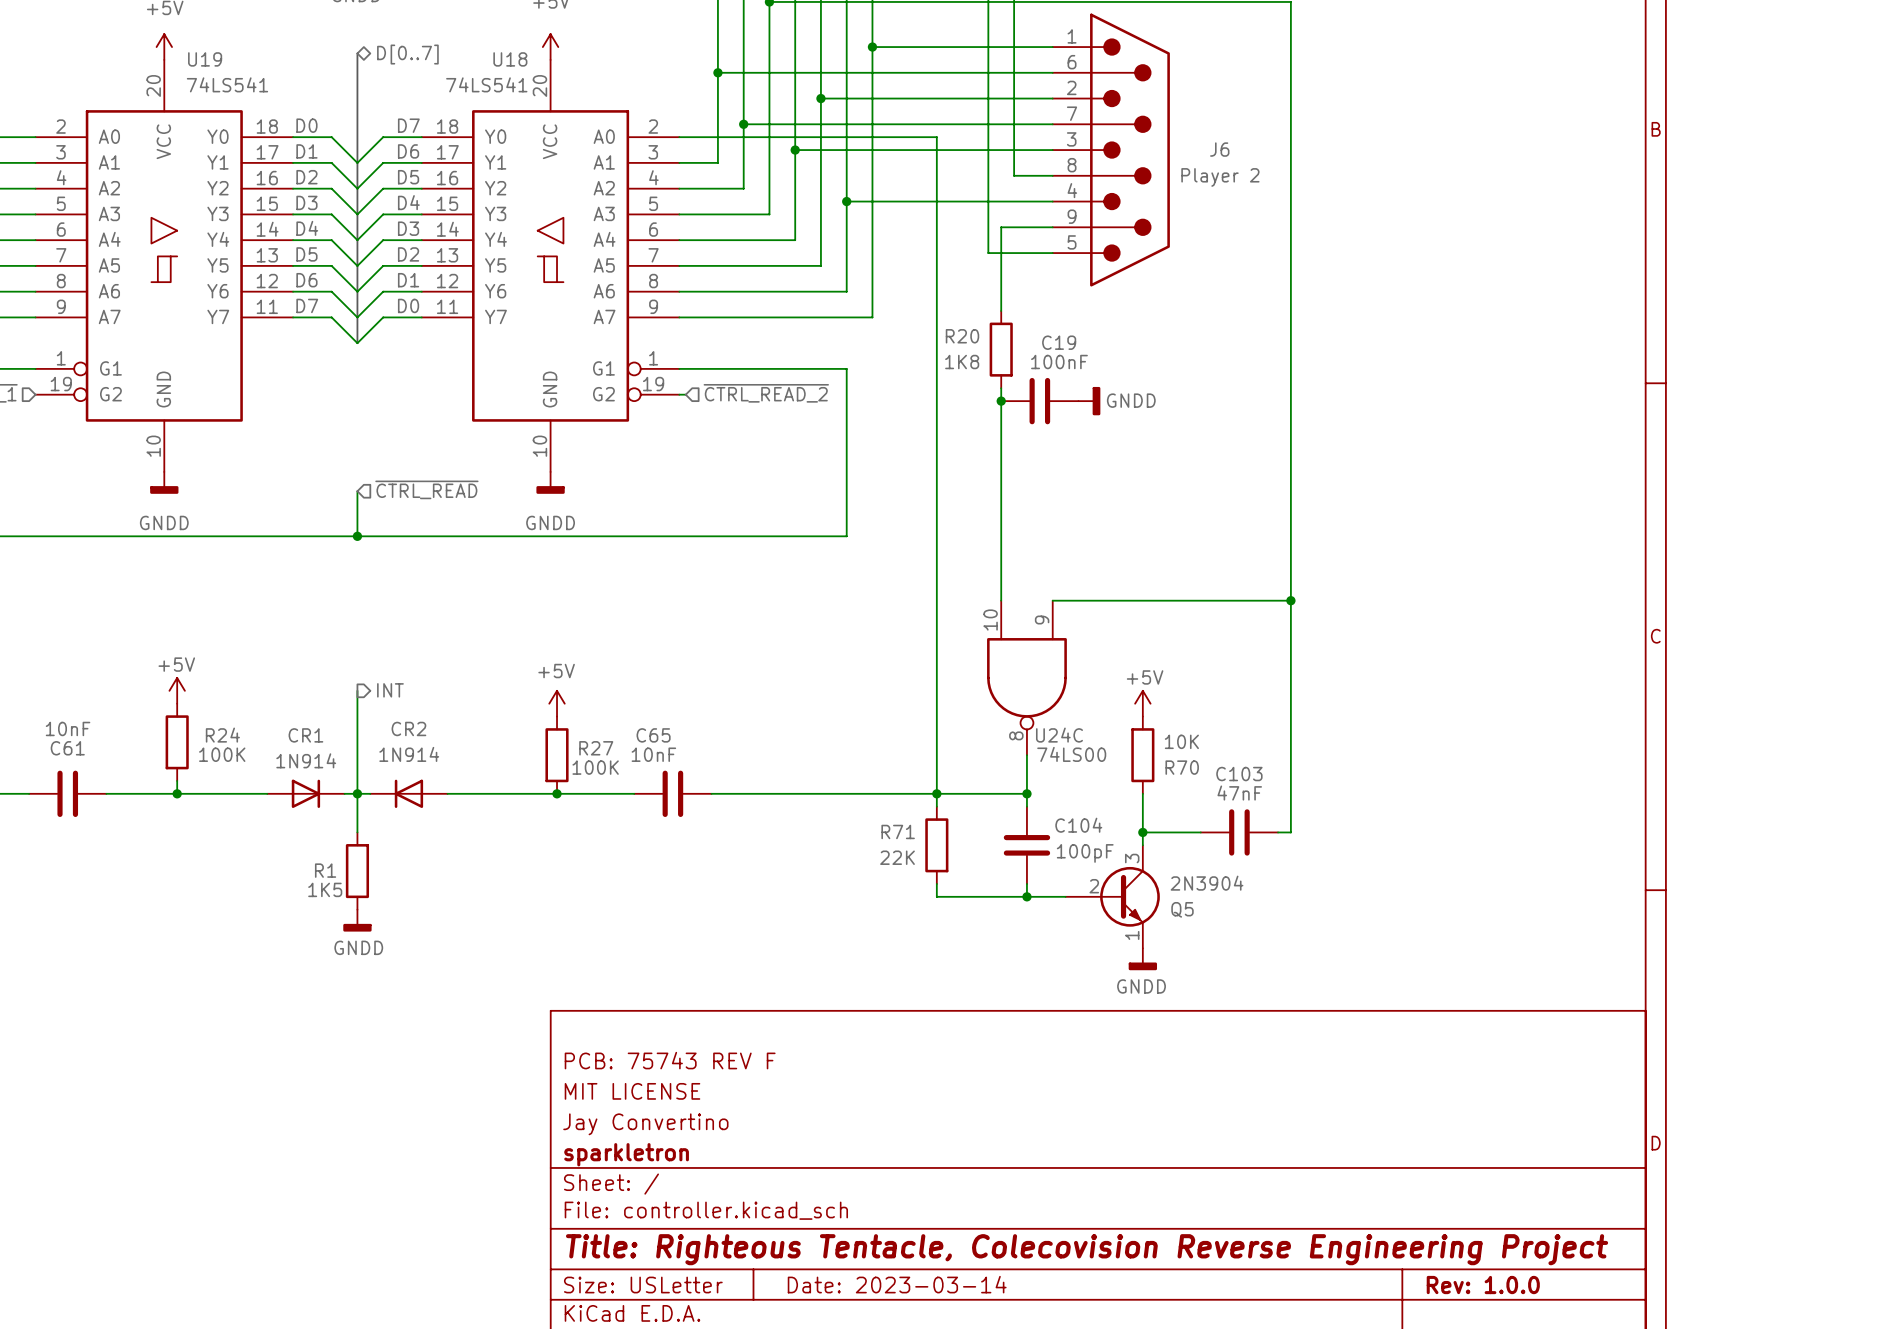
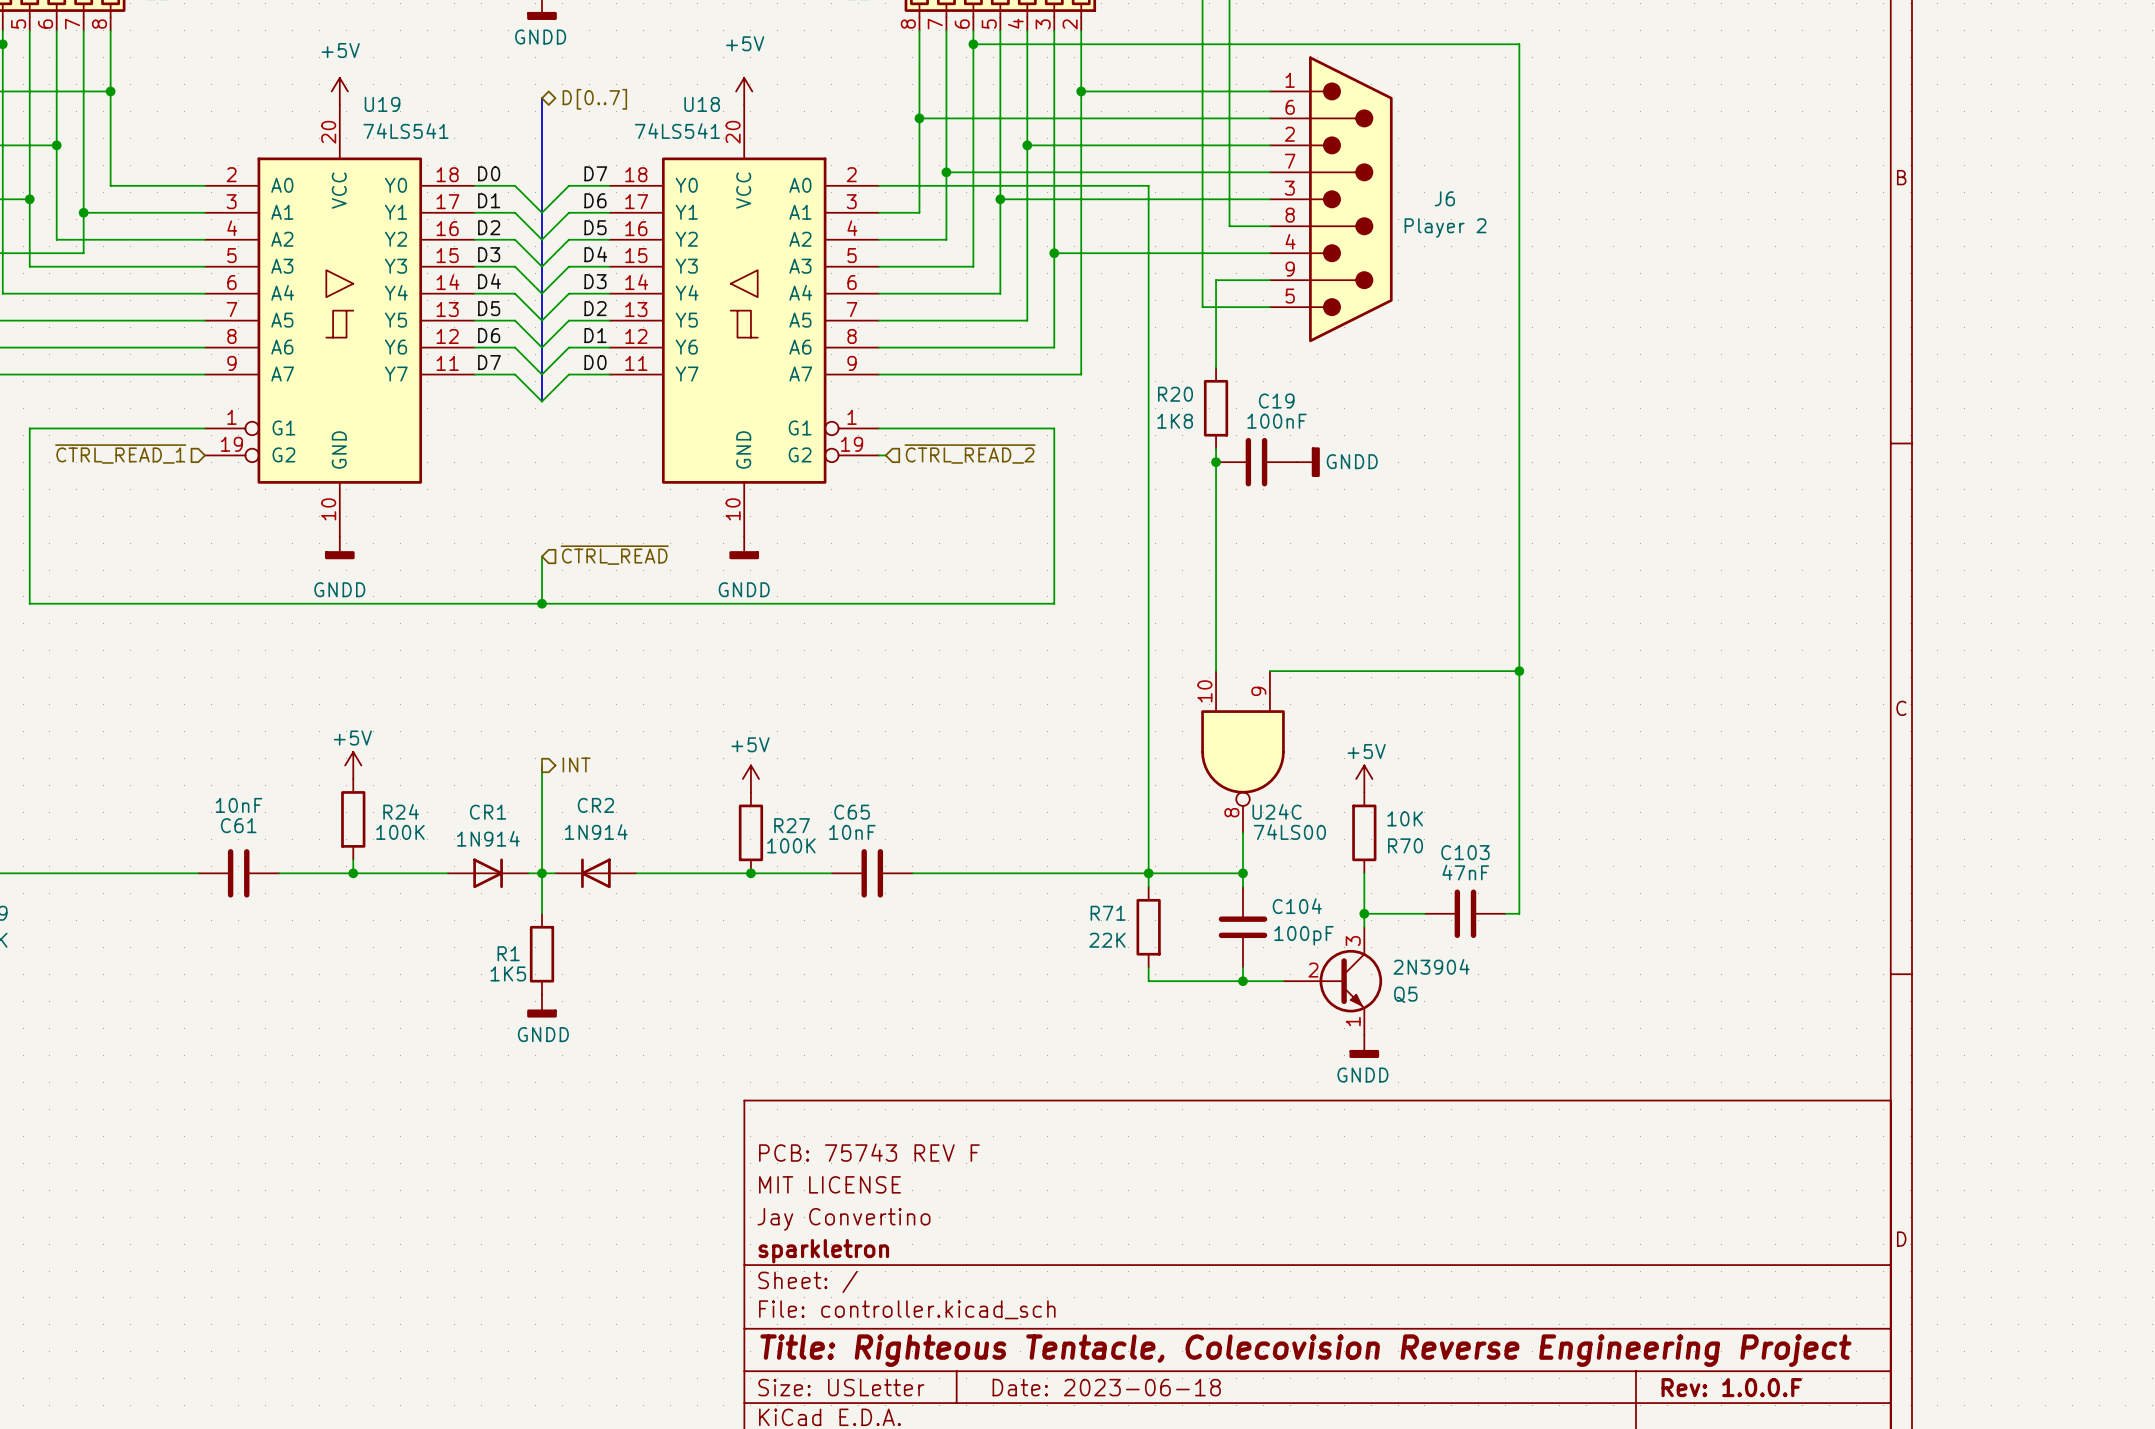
title block: Date: 2023-03-14 (897, 1284) -> Date: 2023-06-18 (1106, 1387)
title block: Rev: 1.0.0 (1483, 1285) -> Rev: 1.0.0.F (1731, 1387)

